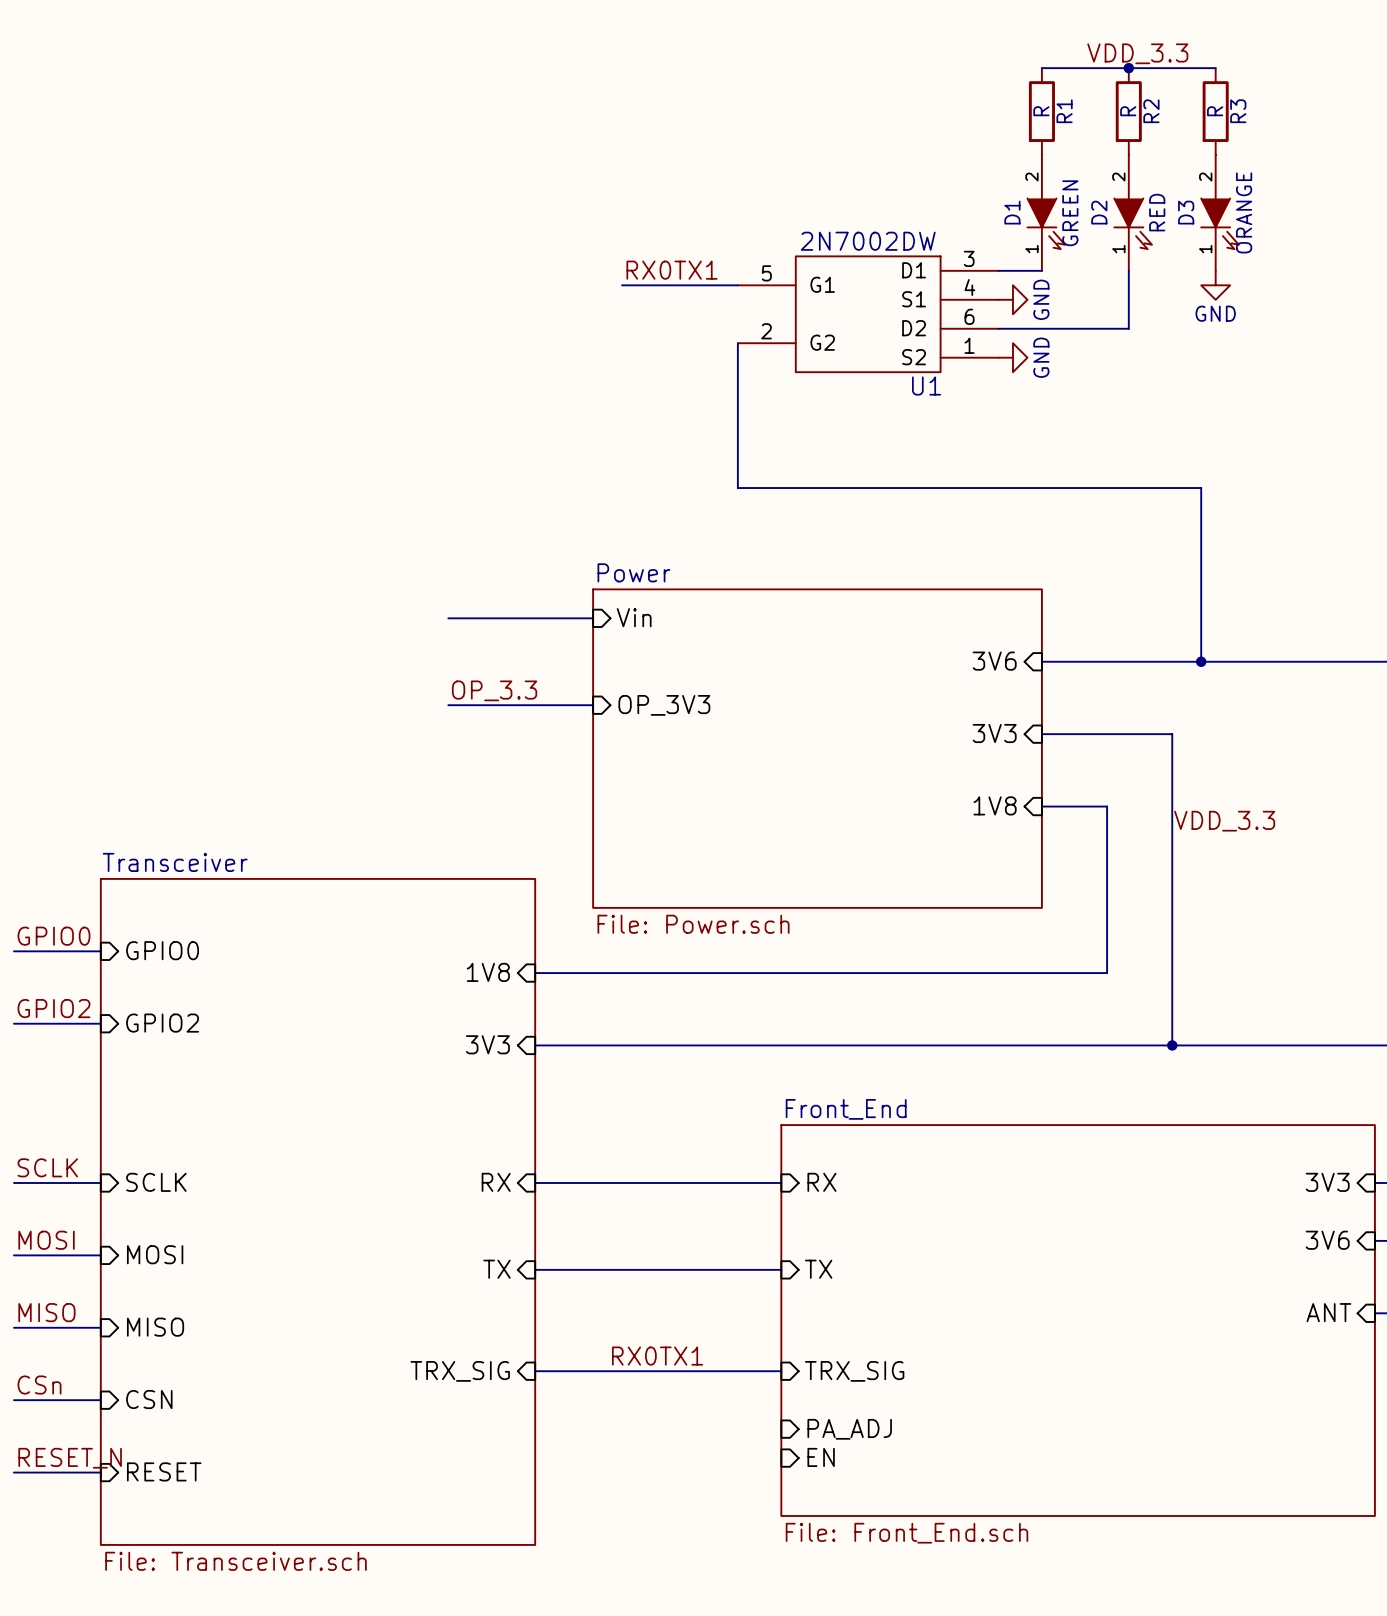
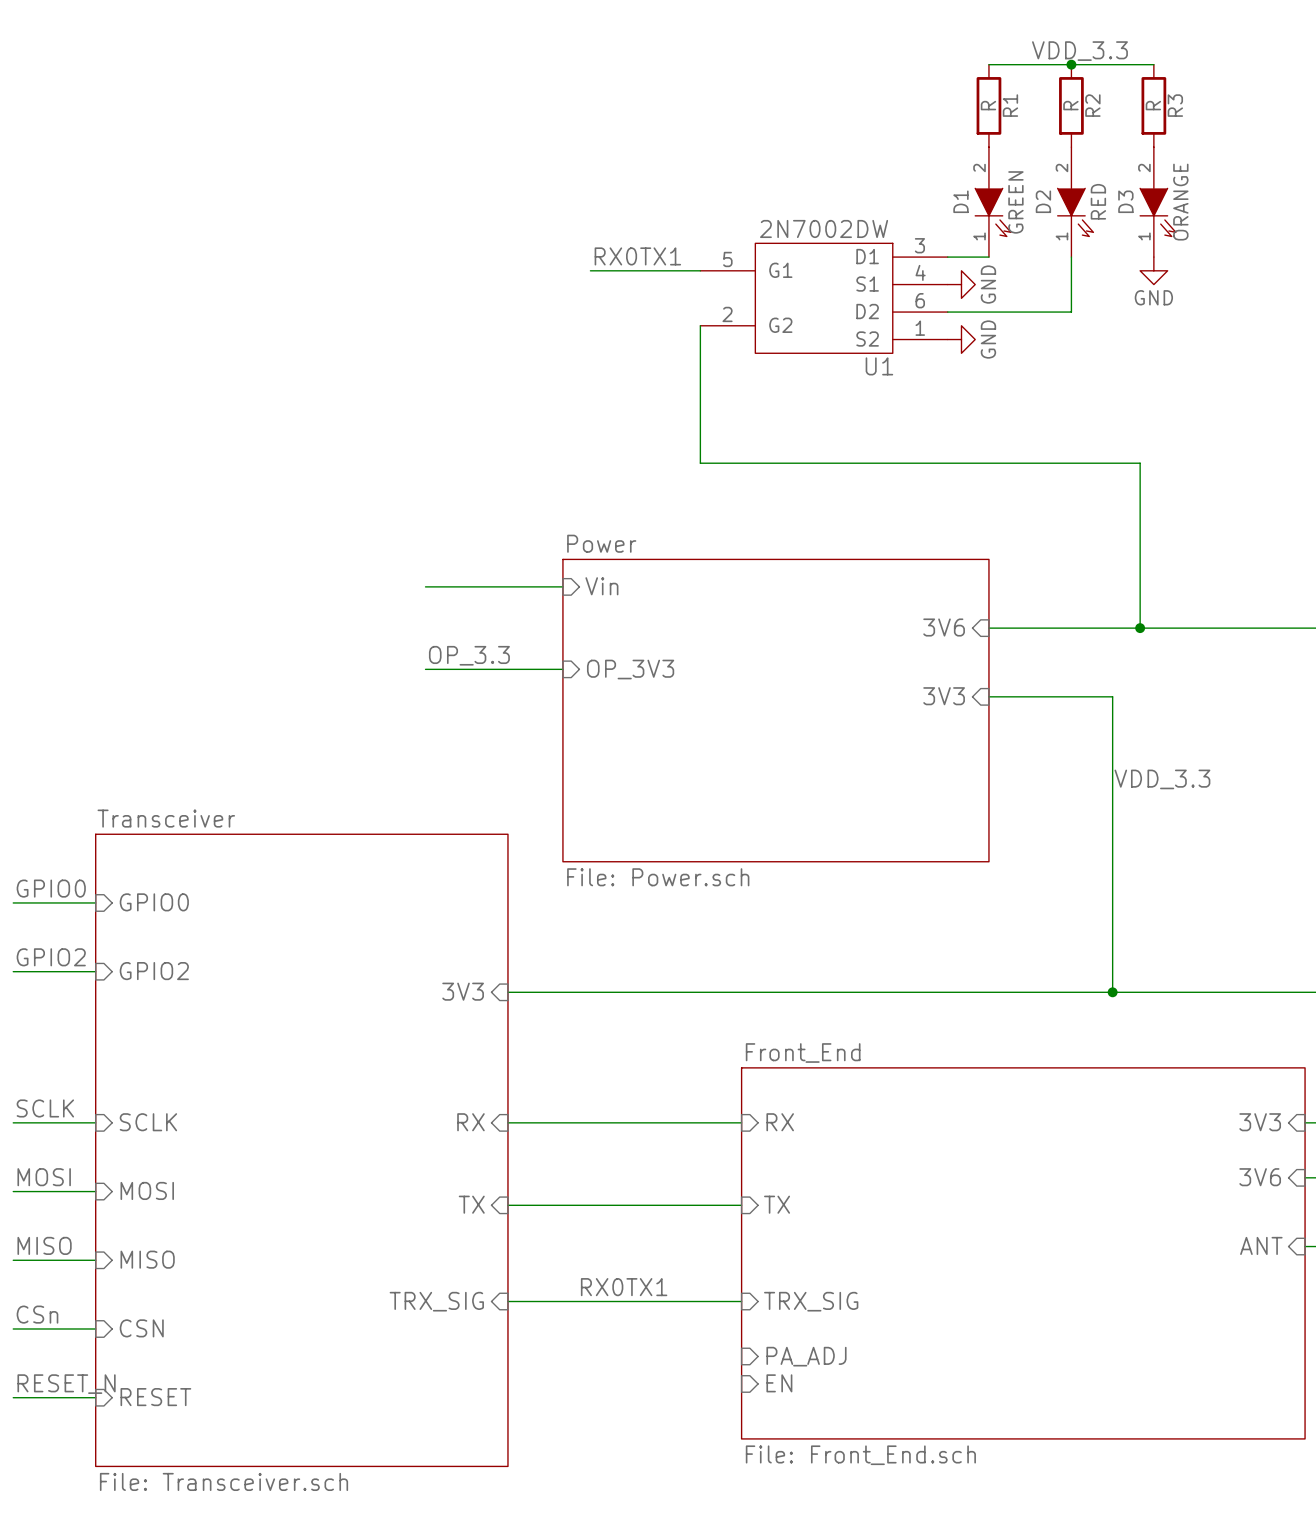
sheet pin: 1V8 (995, 805) -> none
wire: (1041, 806) (1107, 806) (1107, 973) (535, 973) -> none
sheet pin: 1V8 (488, 972) -> none

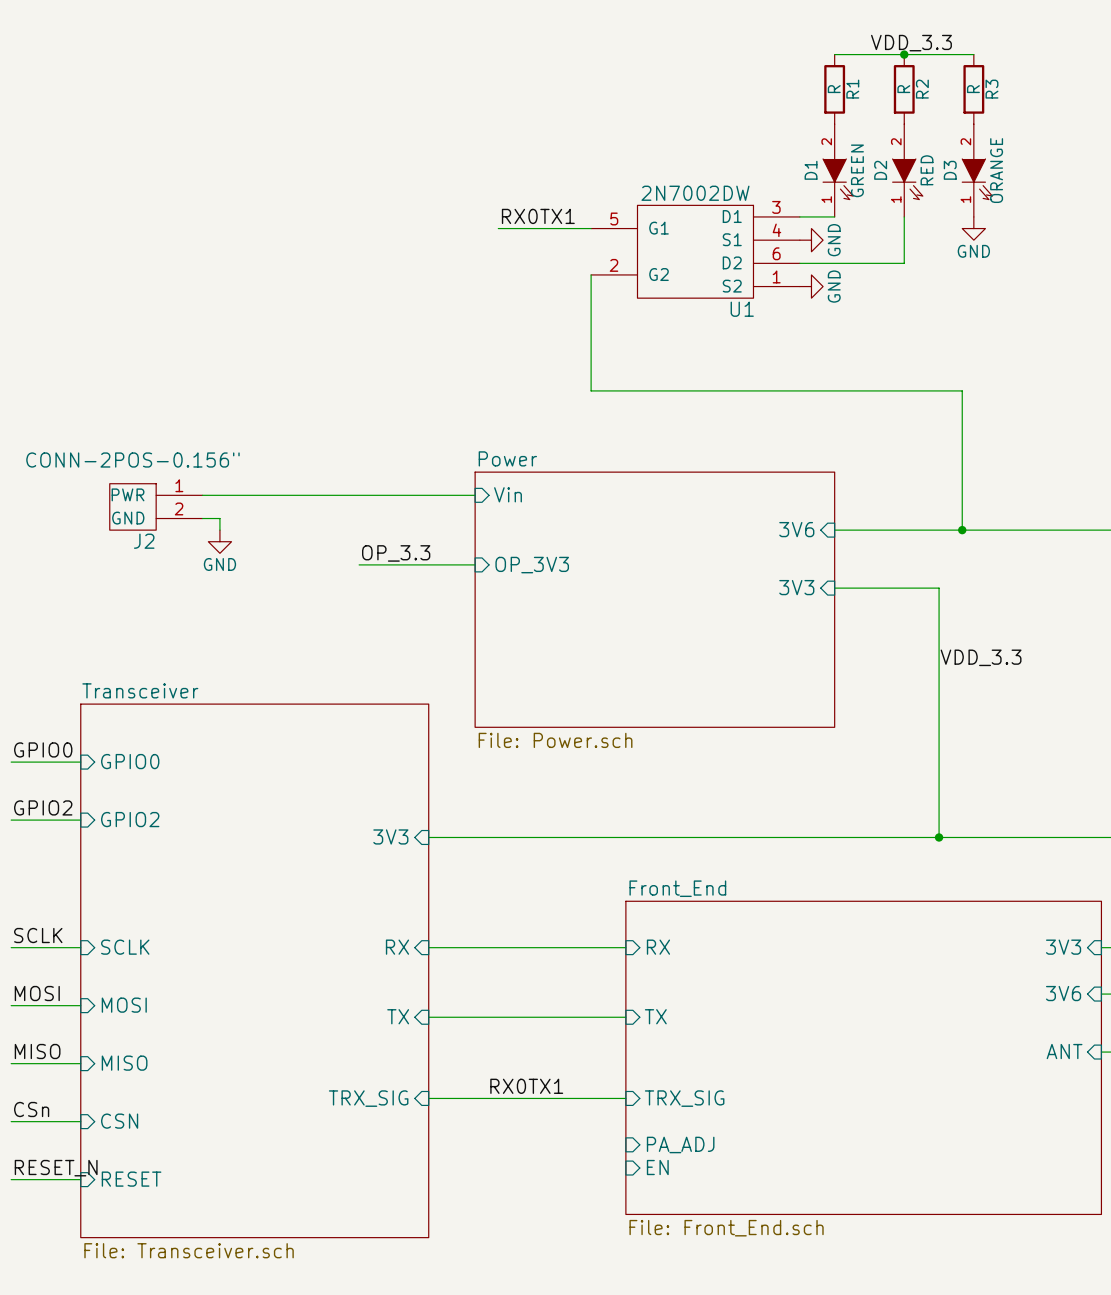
wire: none -> (202, 495) (359, 495)
J2: none -> CONN-2POS-0.156" (156, 506)
wire: none -> (202, 518) (219, 518) (219, 530)
power symbol: none -> GND (219, 541)

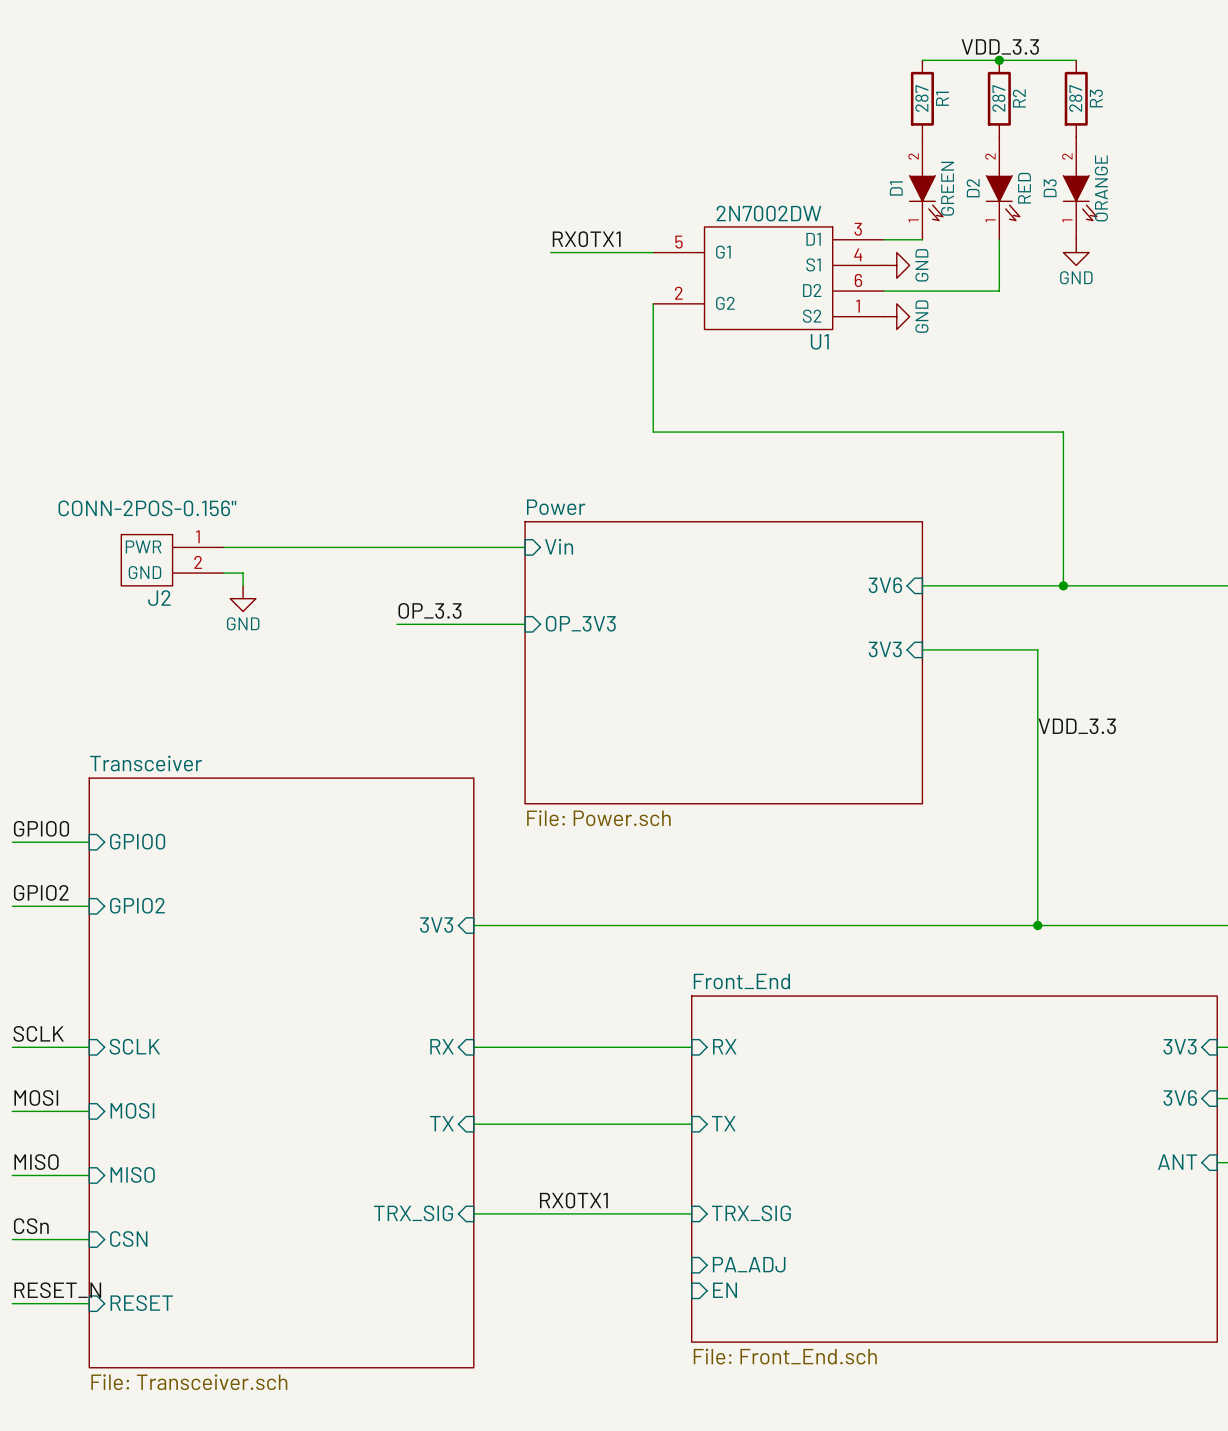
R1 value: R (834, 89) -> 287 (921, 98)
R2 value: R (903, 89) -> 287 (998, 98)
R3 value: R (973, 89) -> 287 (1075, 98)

